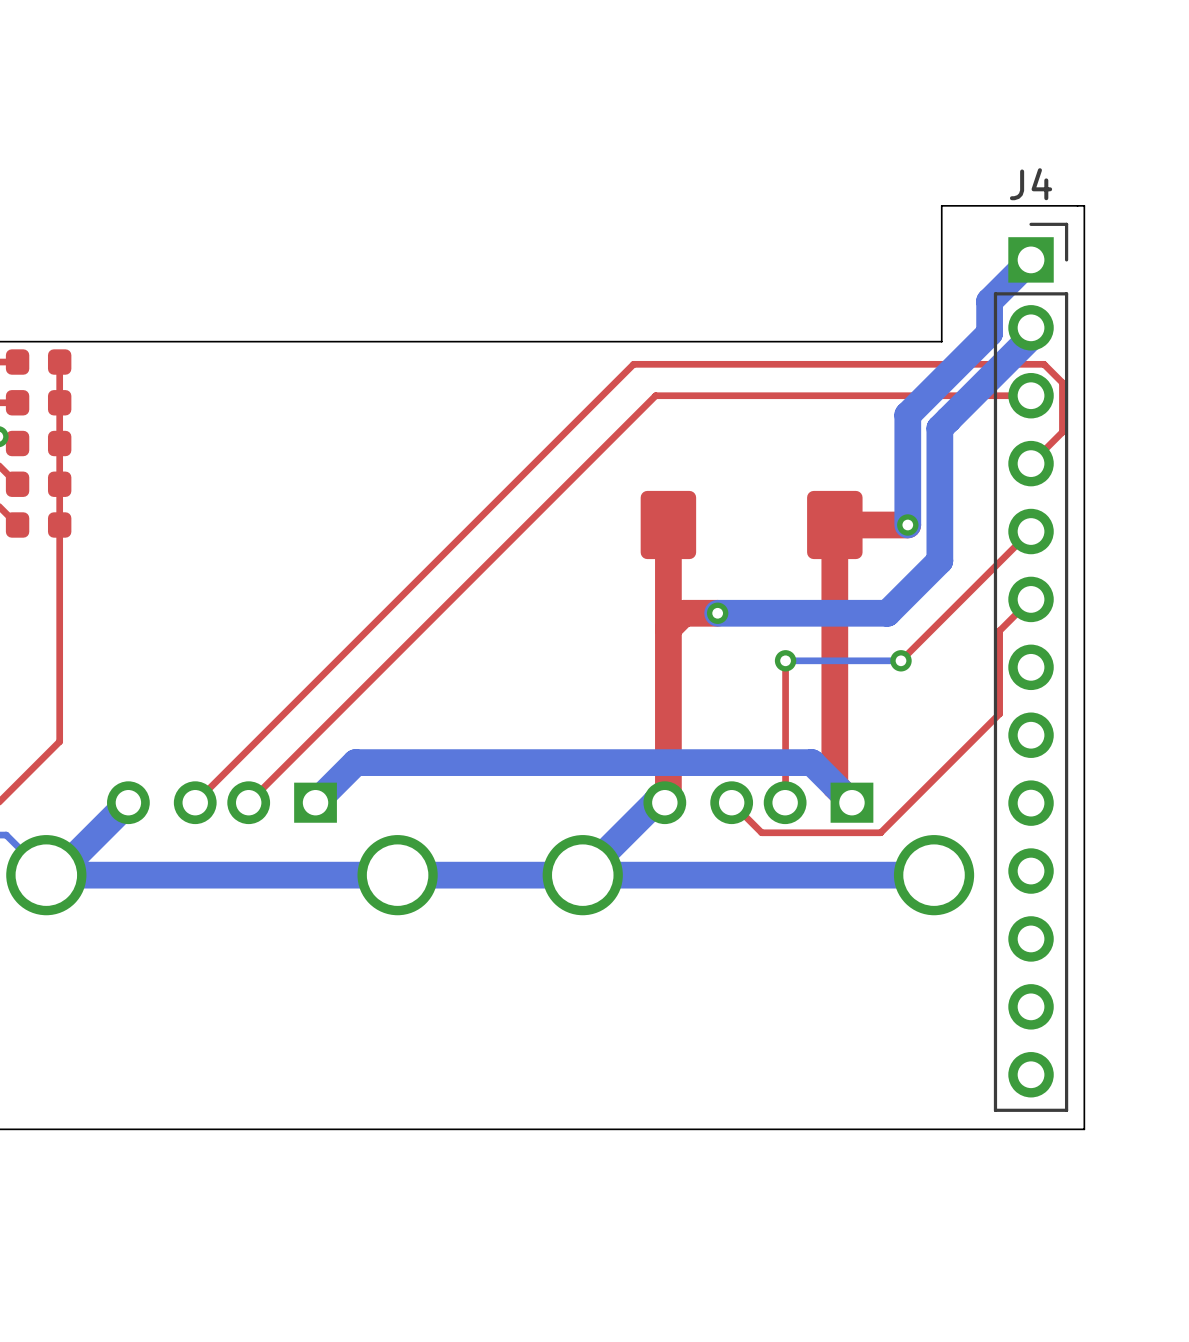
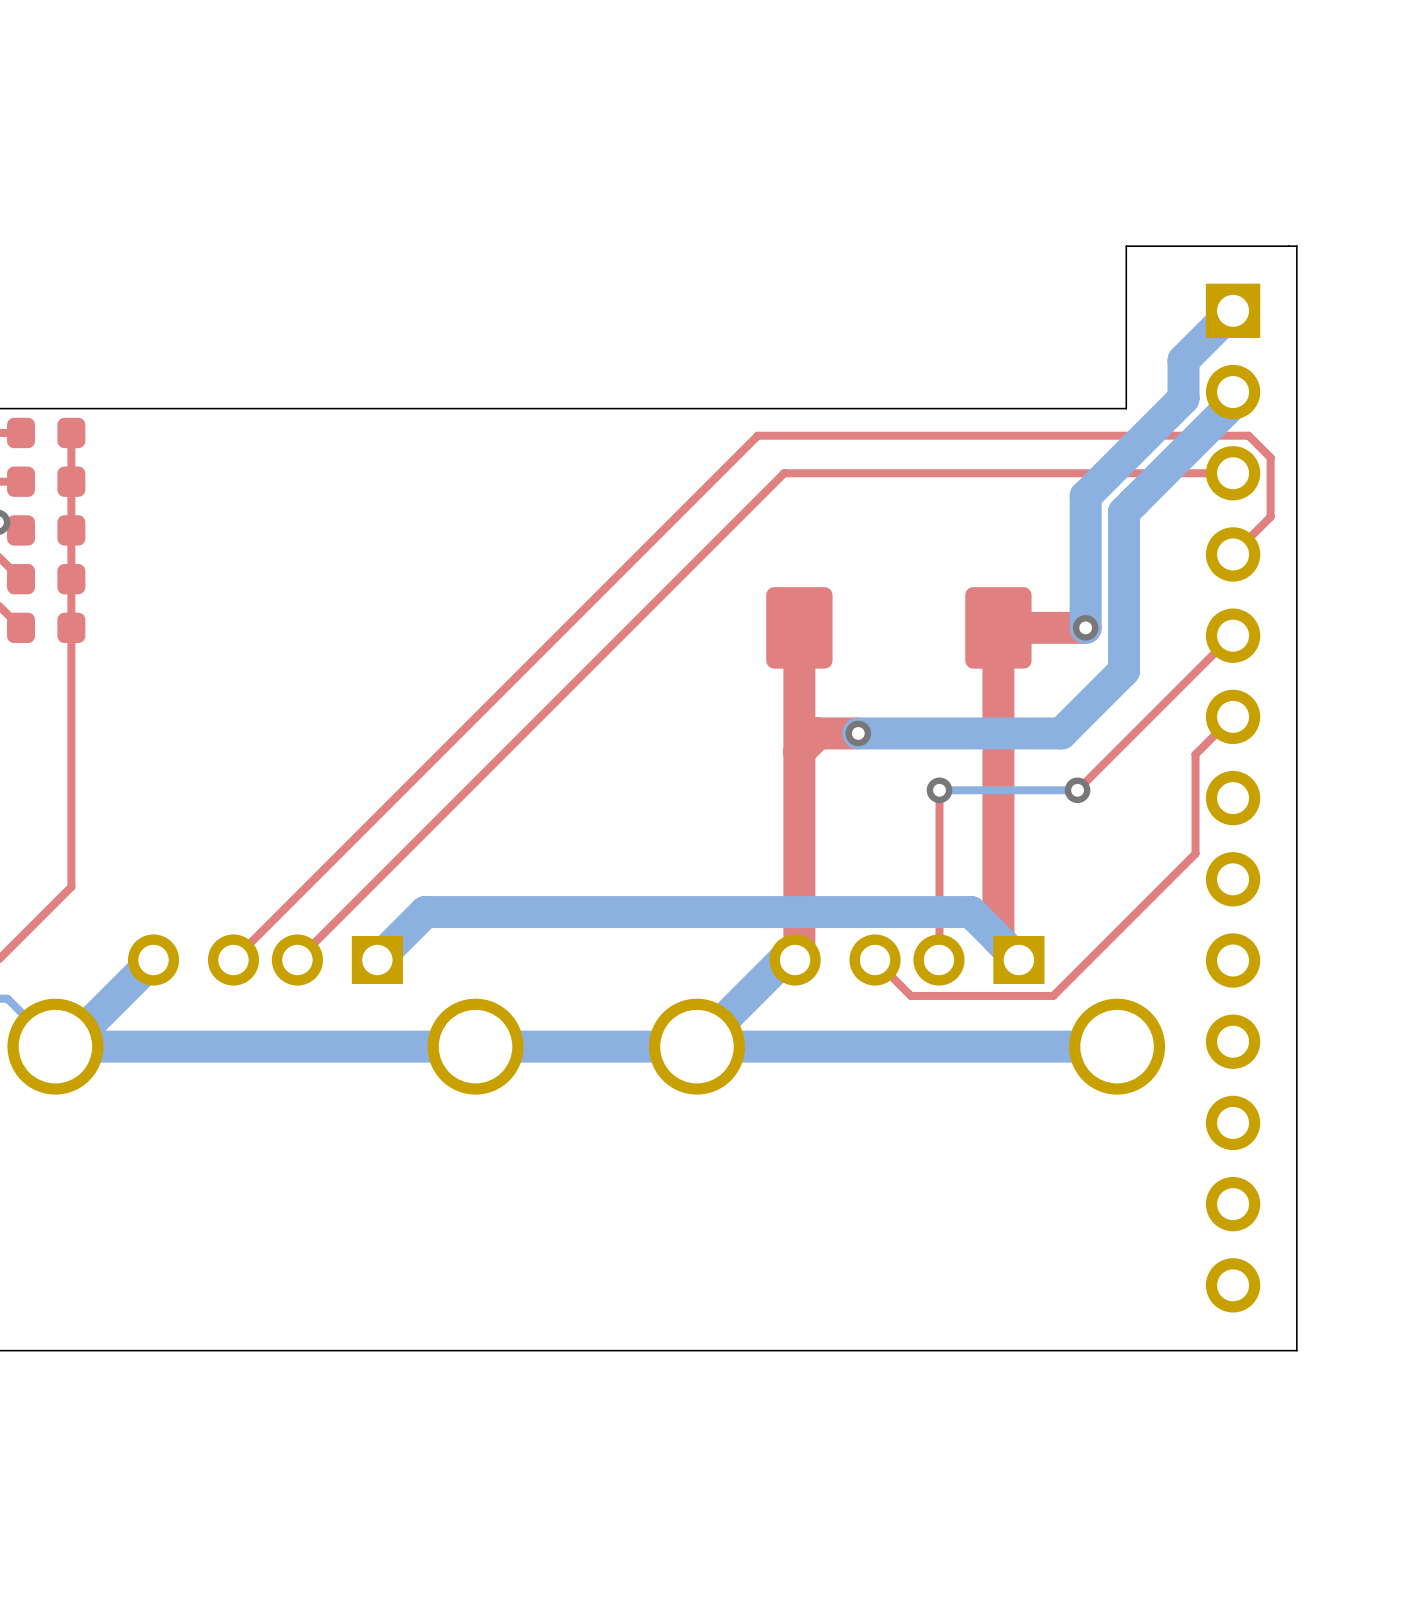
J4 side: bottom (1031, 667) -> top (1233, 798)

